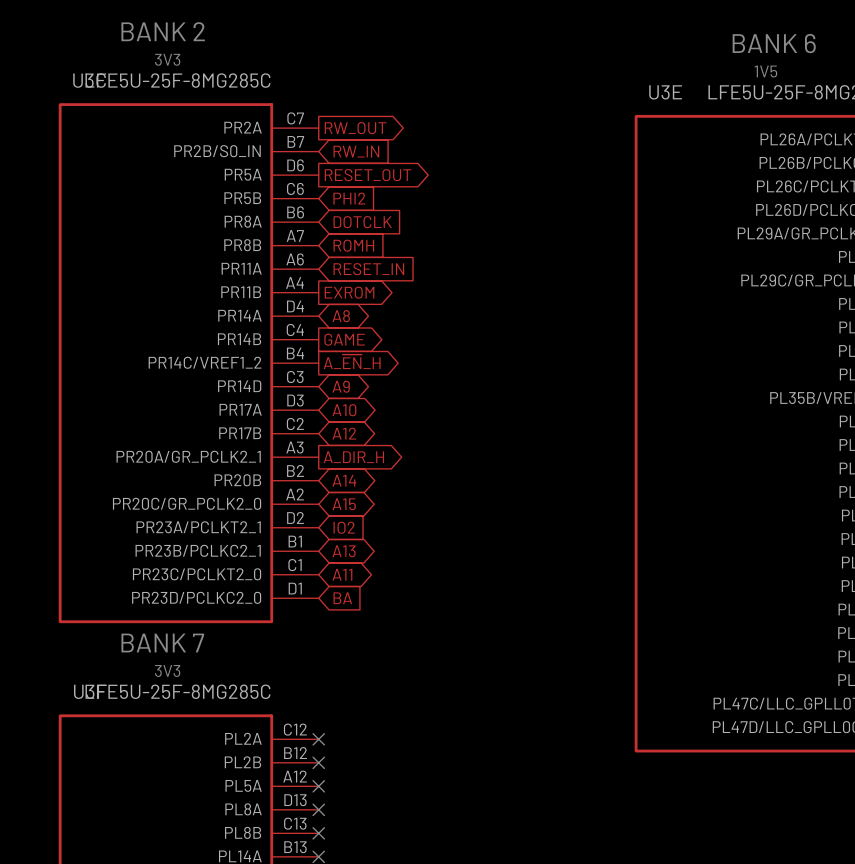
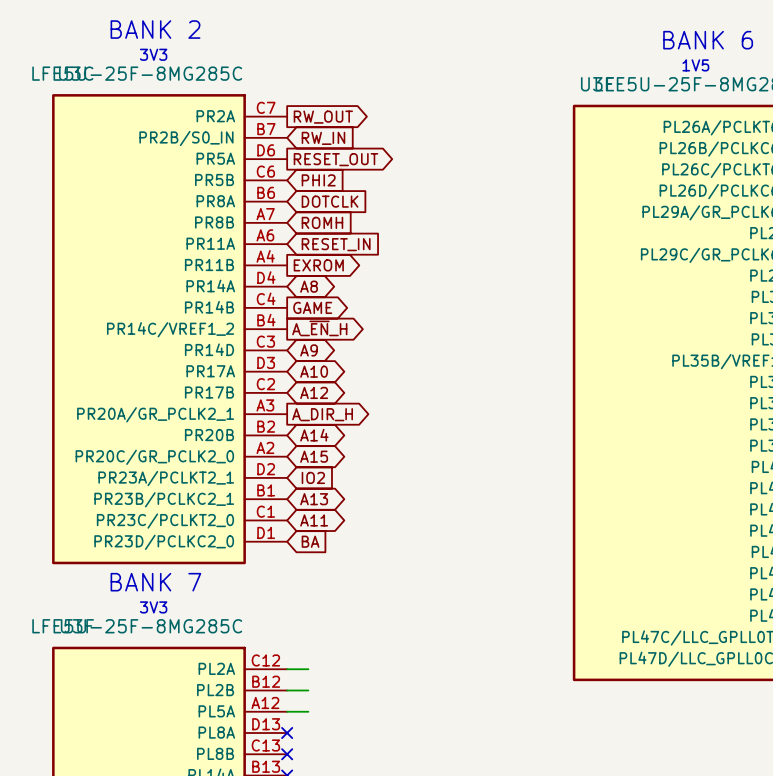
wire: none -> (287, 669) (308, 669)
no-connect mark: (318, 739) -> none
wire: none -> (287, 690) (308, 690)
no-connect mark: (318, 762) -> none
wire: none -> (287, 711) (308, 711)
no-connect mark: (318, 786) -> none

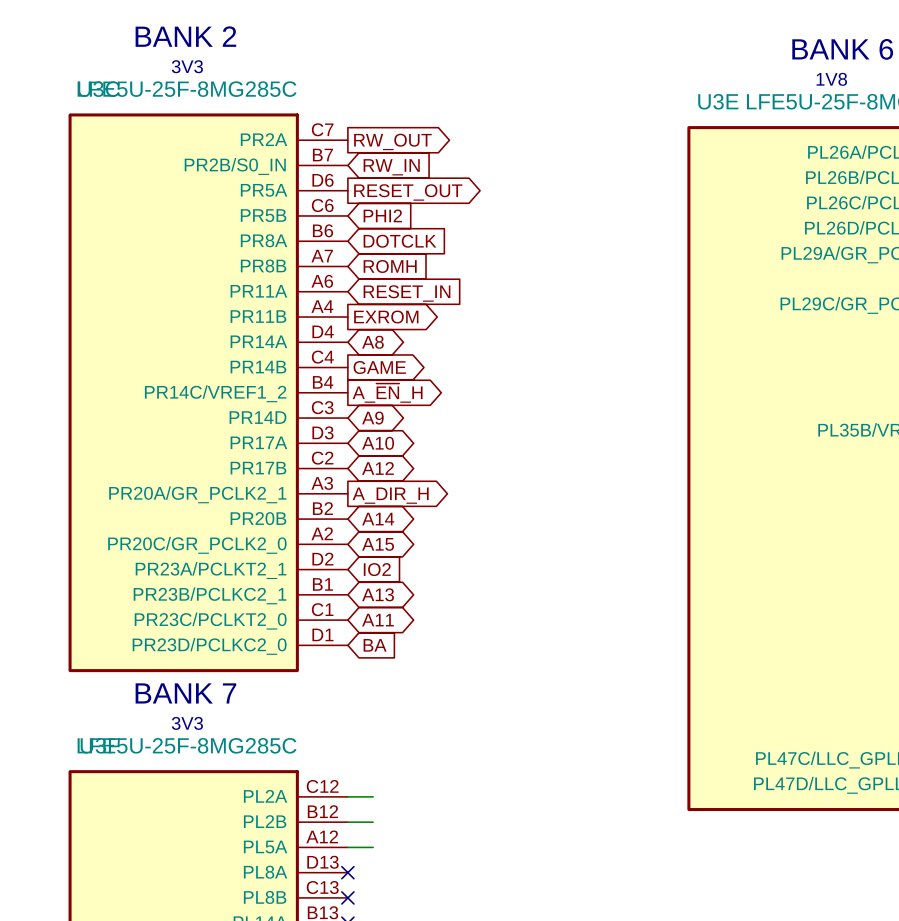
text: 1V5 (695, 65) -> 1V8 (831, 79)

